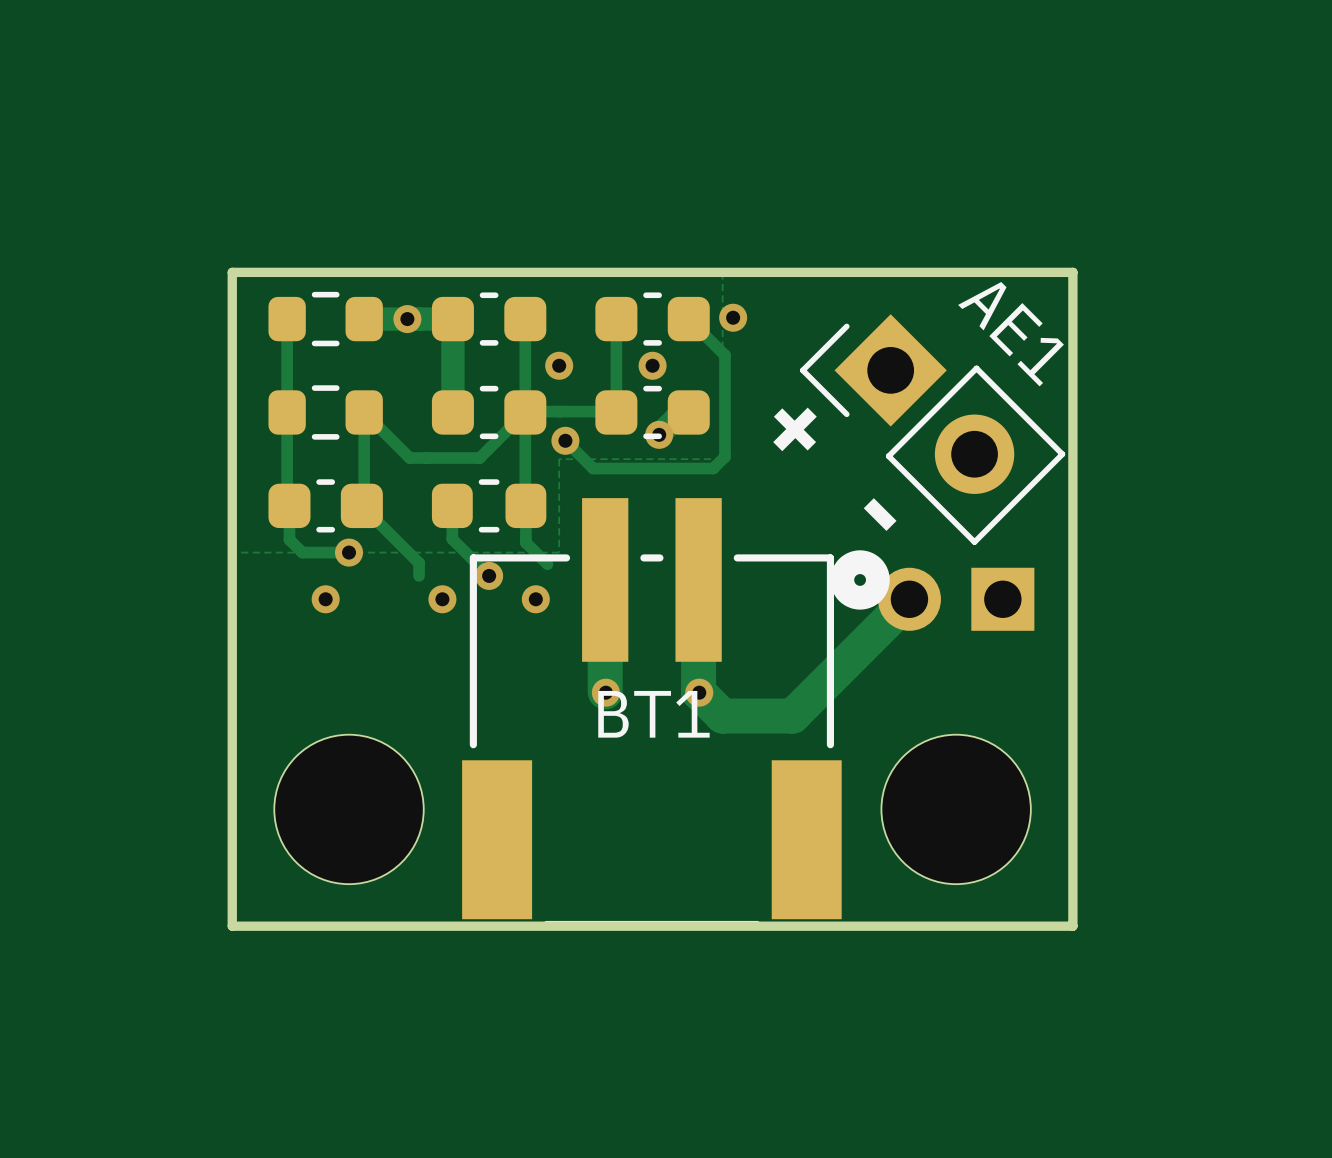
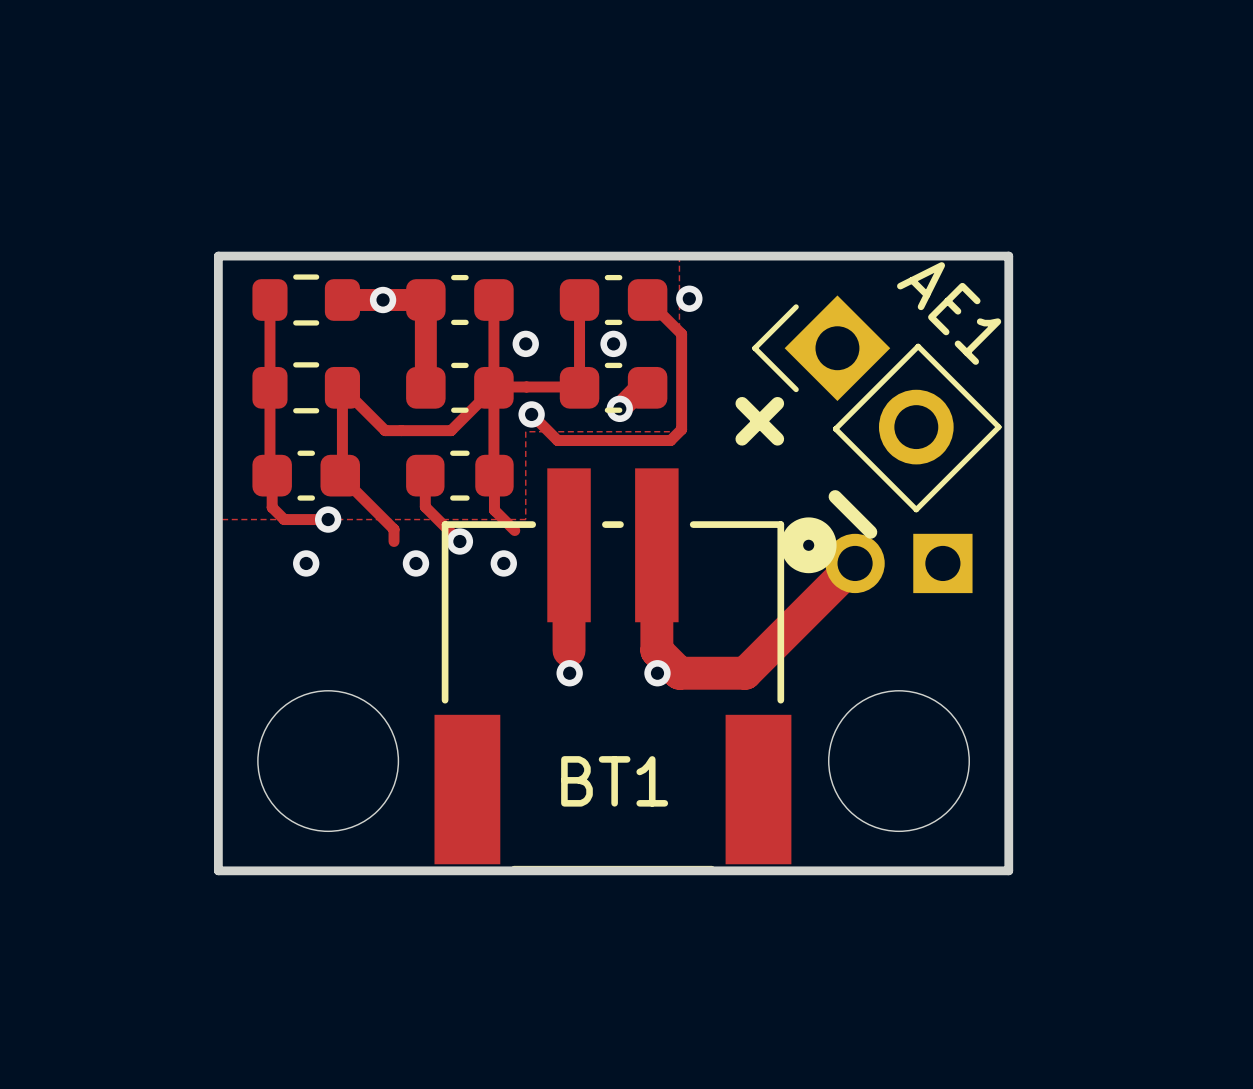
via position: (605, 692) -> (569, 673)
via position: (699, 692) -> (657, 673)
BT1 name position: BT1 (653, 714) -> BT1 (614, 781)

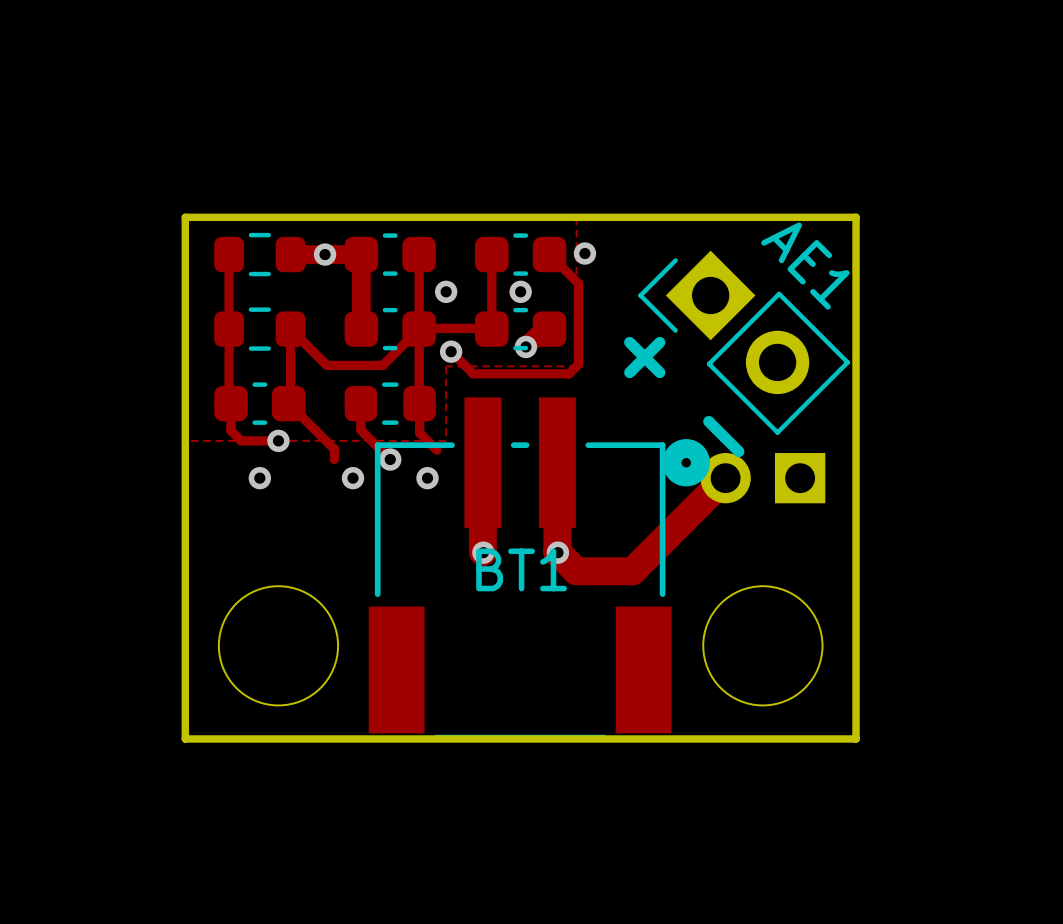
via position: (569, 673) -> (483, 552)
via position: (657, 673) -> (557, 552)
BT1 name position: BT1 (614, 781) -> BT1 (521, 569)

